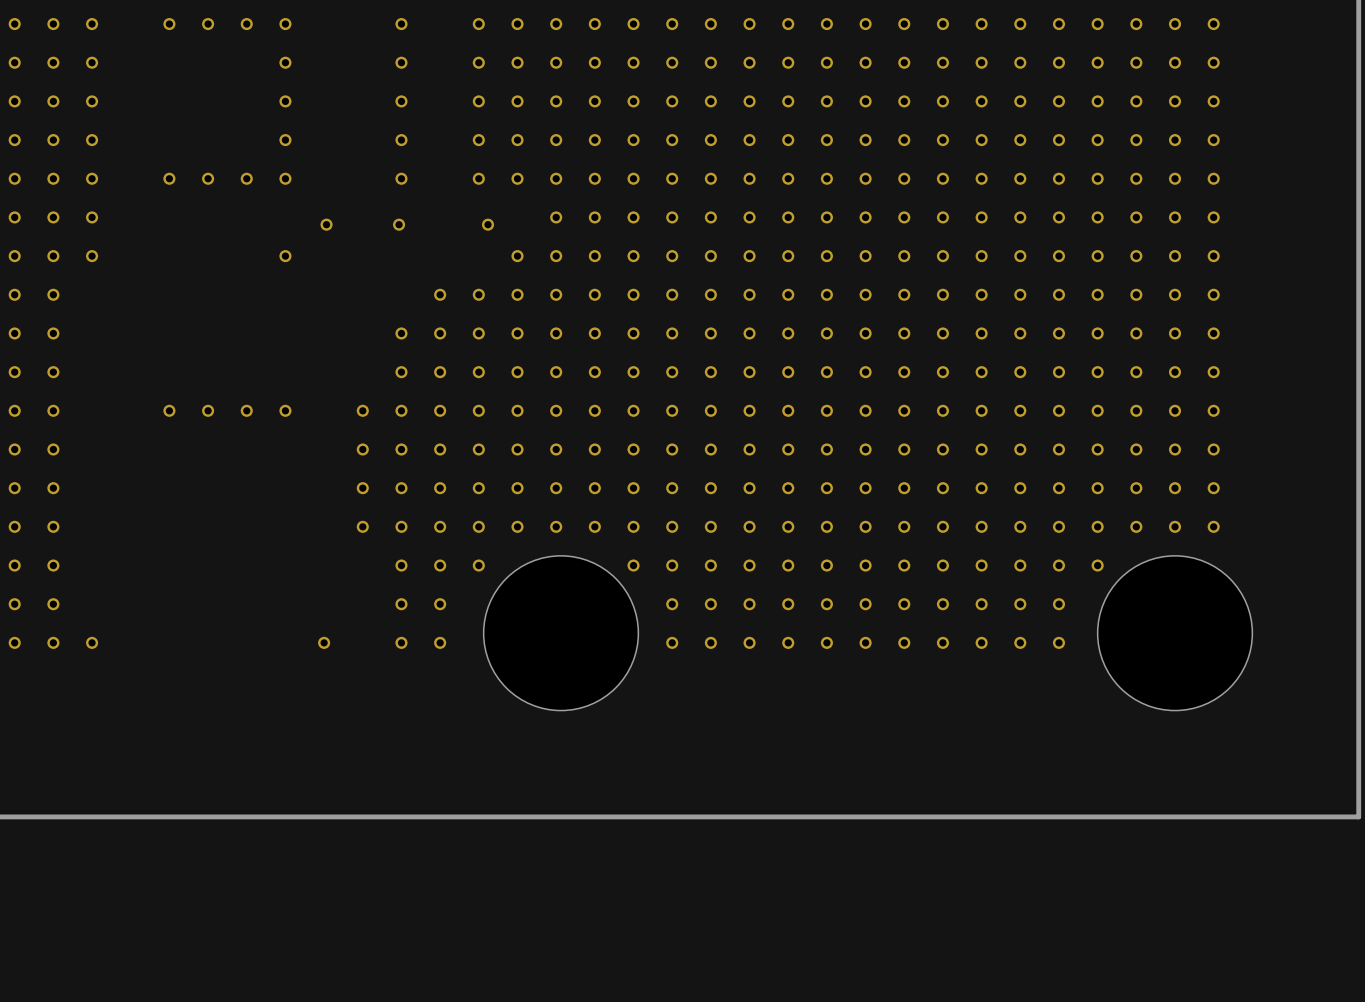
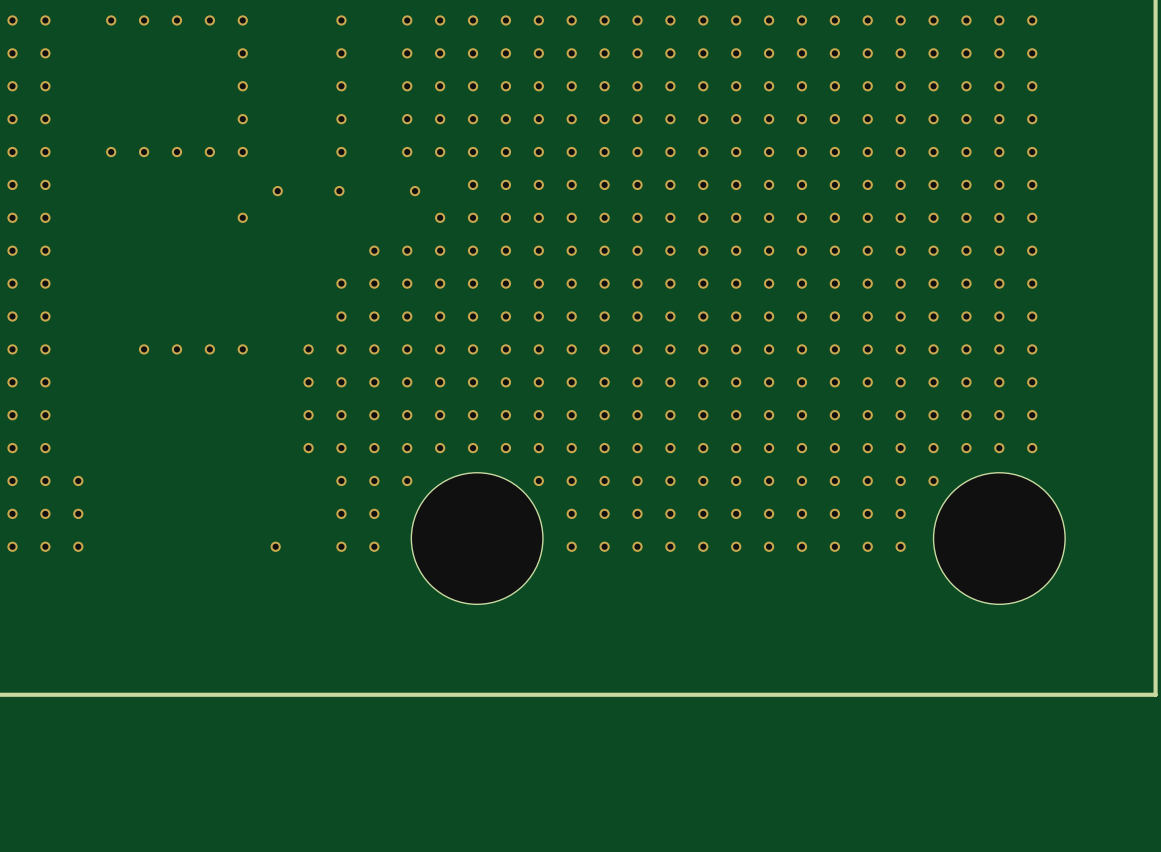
via: (92, 24) -> none
via: none -> (111, 20)
via: (92, 62) -> none
via: (92, 101) -> none
via: (92, 140) -> none
via: (92, 178) -> none
via: none -> (111, 152)
via: (92, 217) -> none
via: (92, 256) -> none
via: none -> (78, 480)
via: none -> (78, 513)

